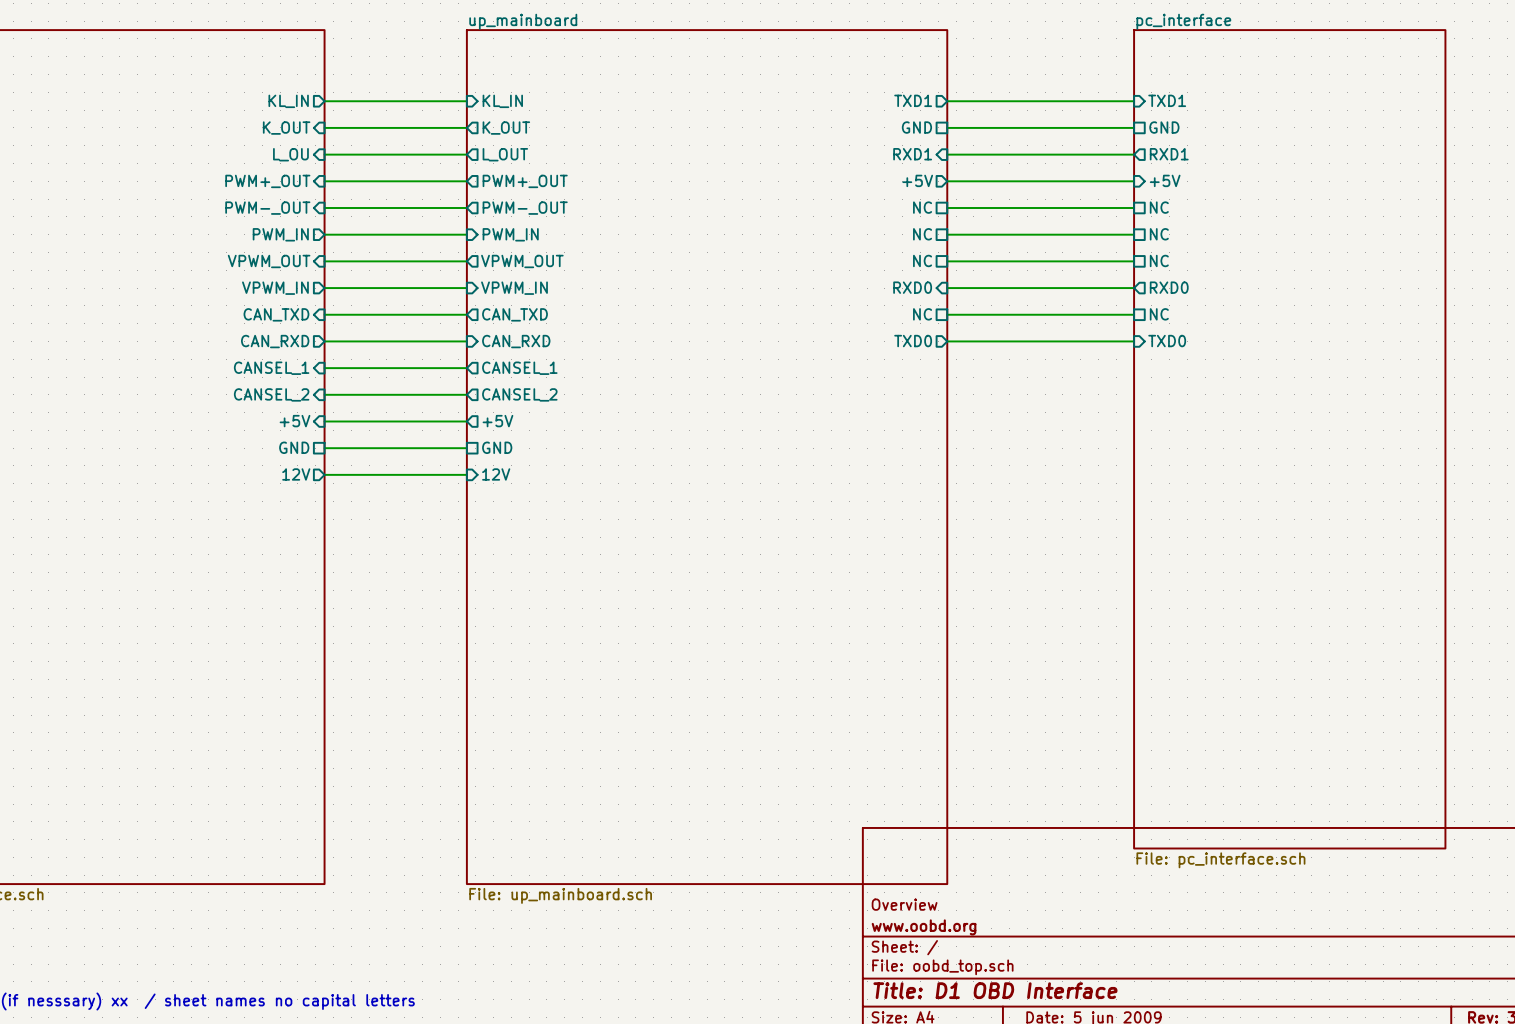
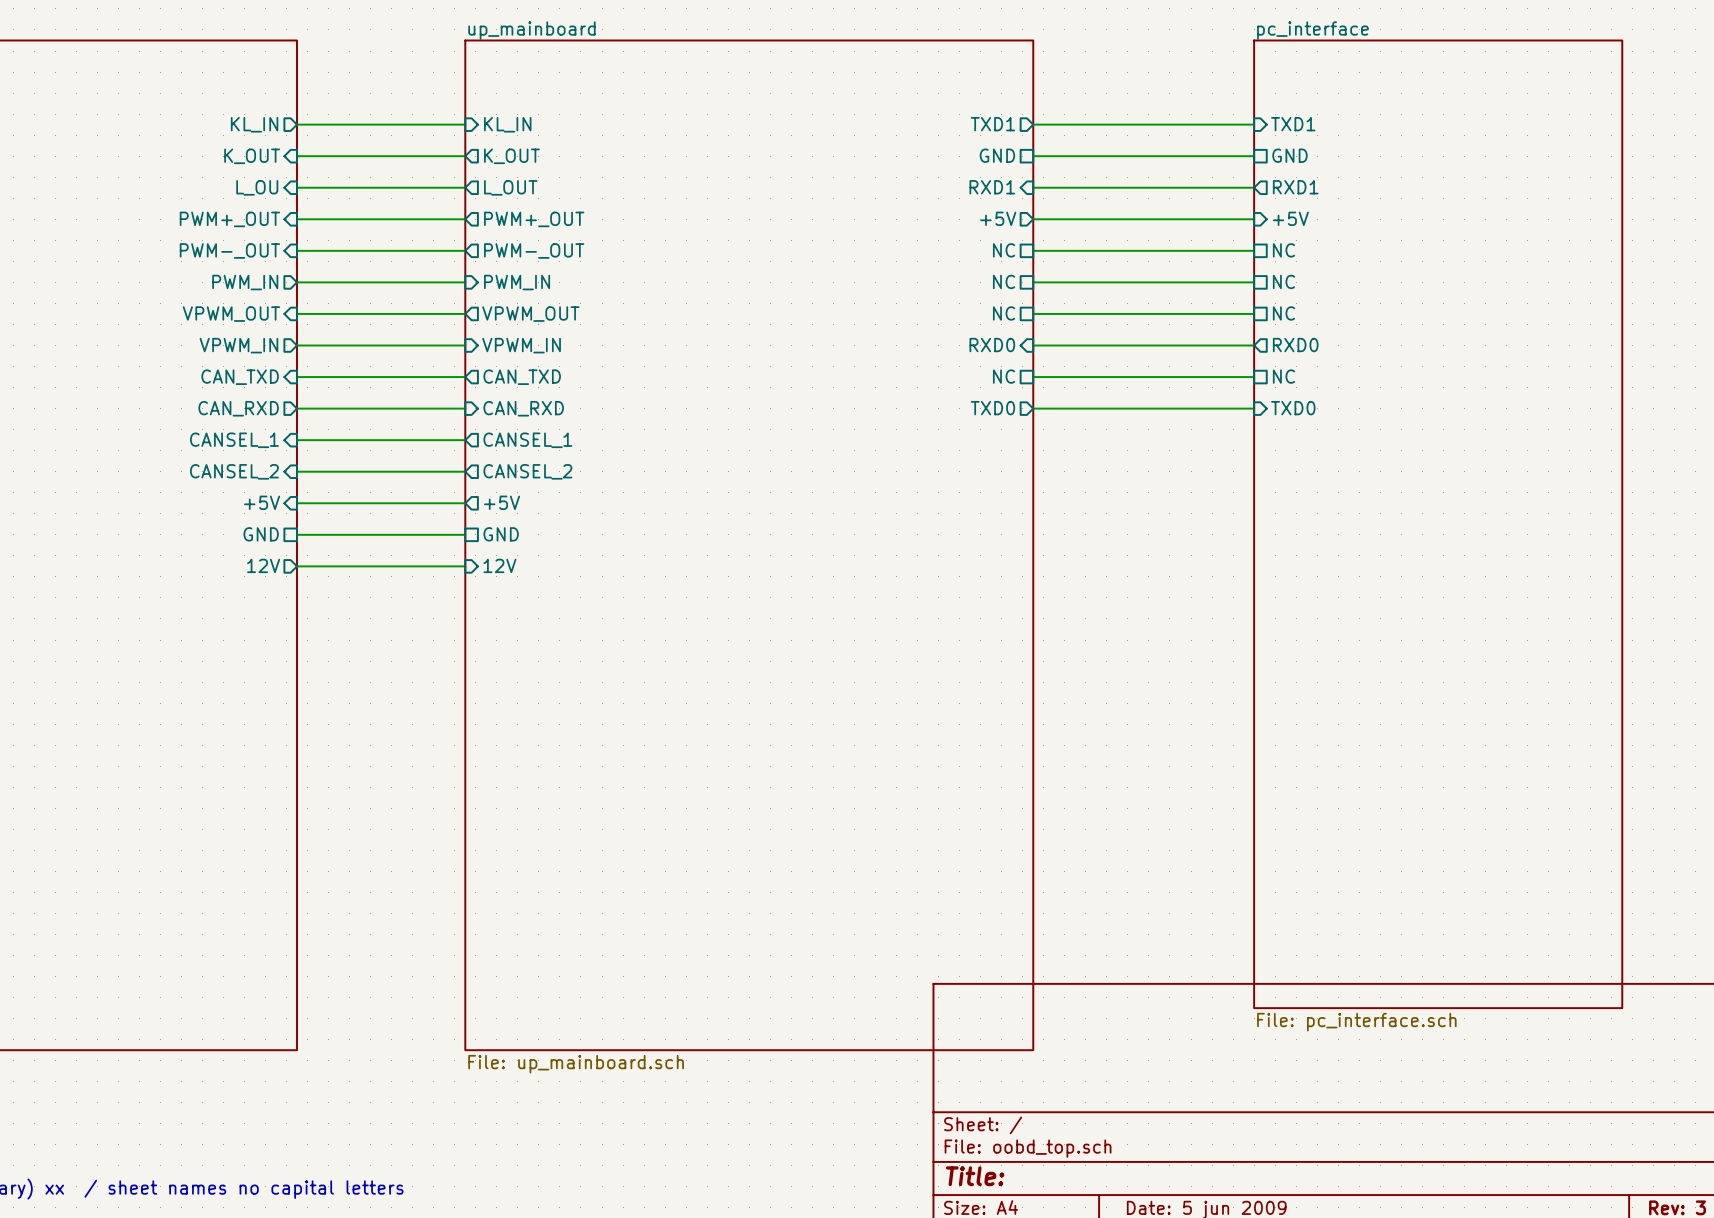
title block: Overview (904, 904) -> none
title block: www.oobd.org (924, 927) -> none
title block: Title: D1 OBD Interface (995, 990) -> Title: (975, 1176)

